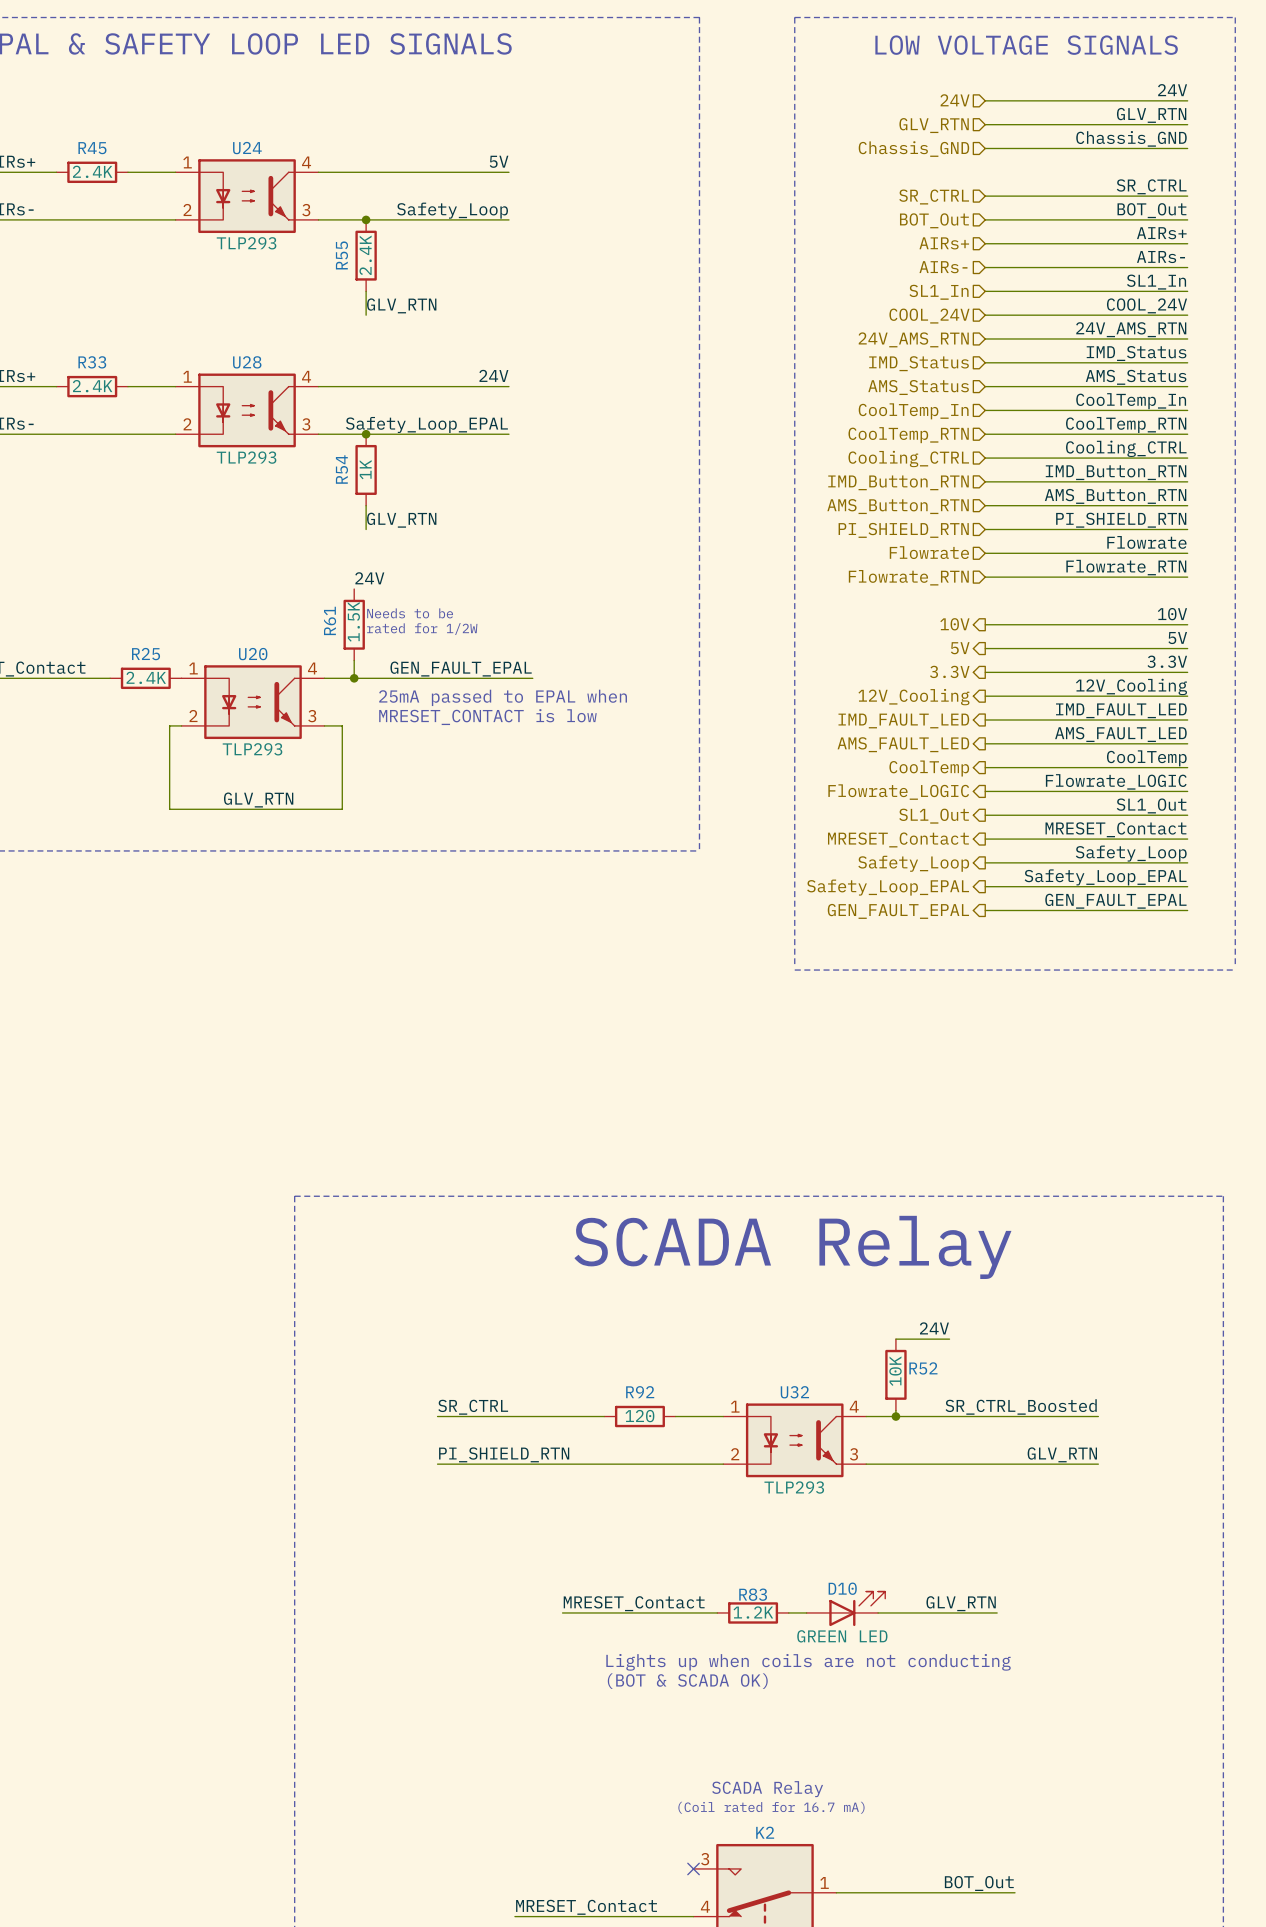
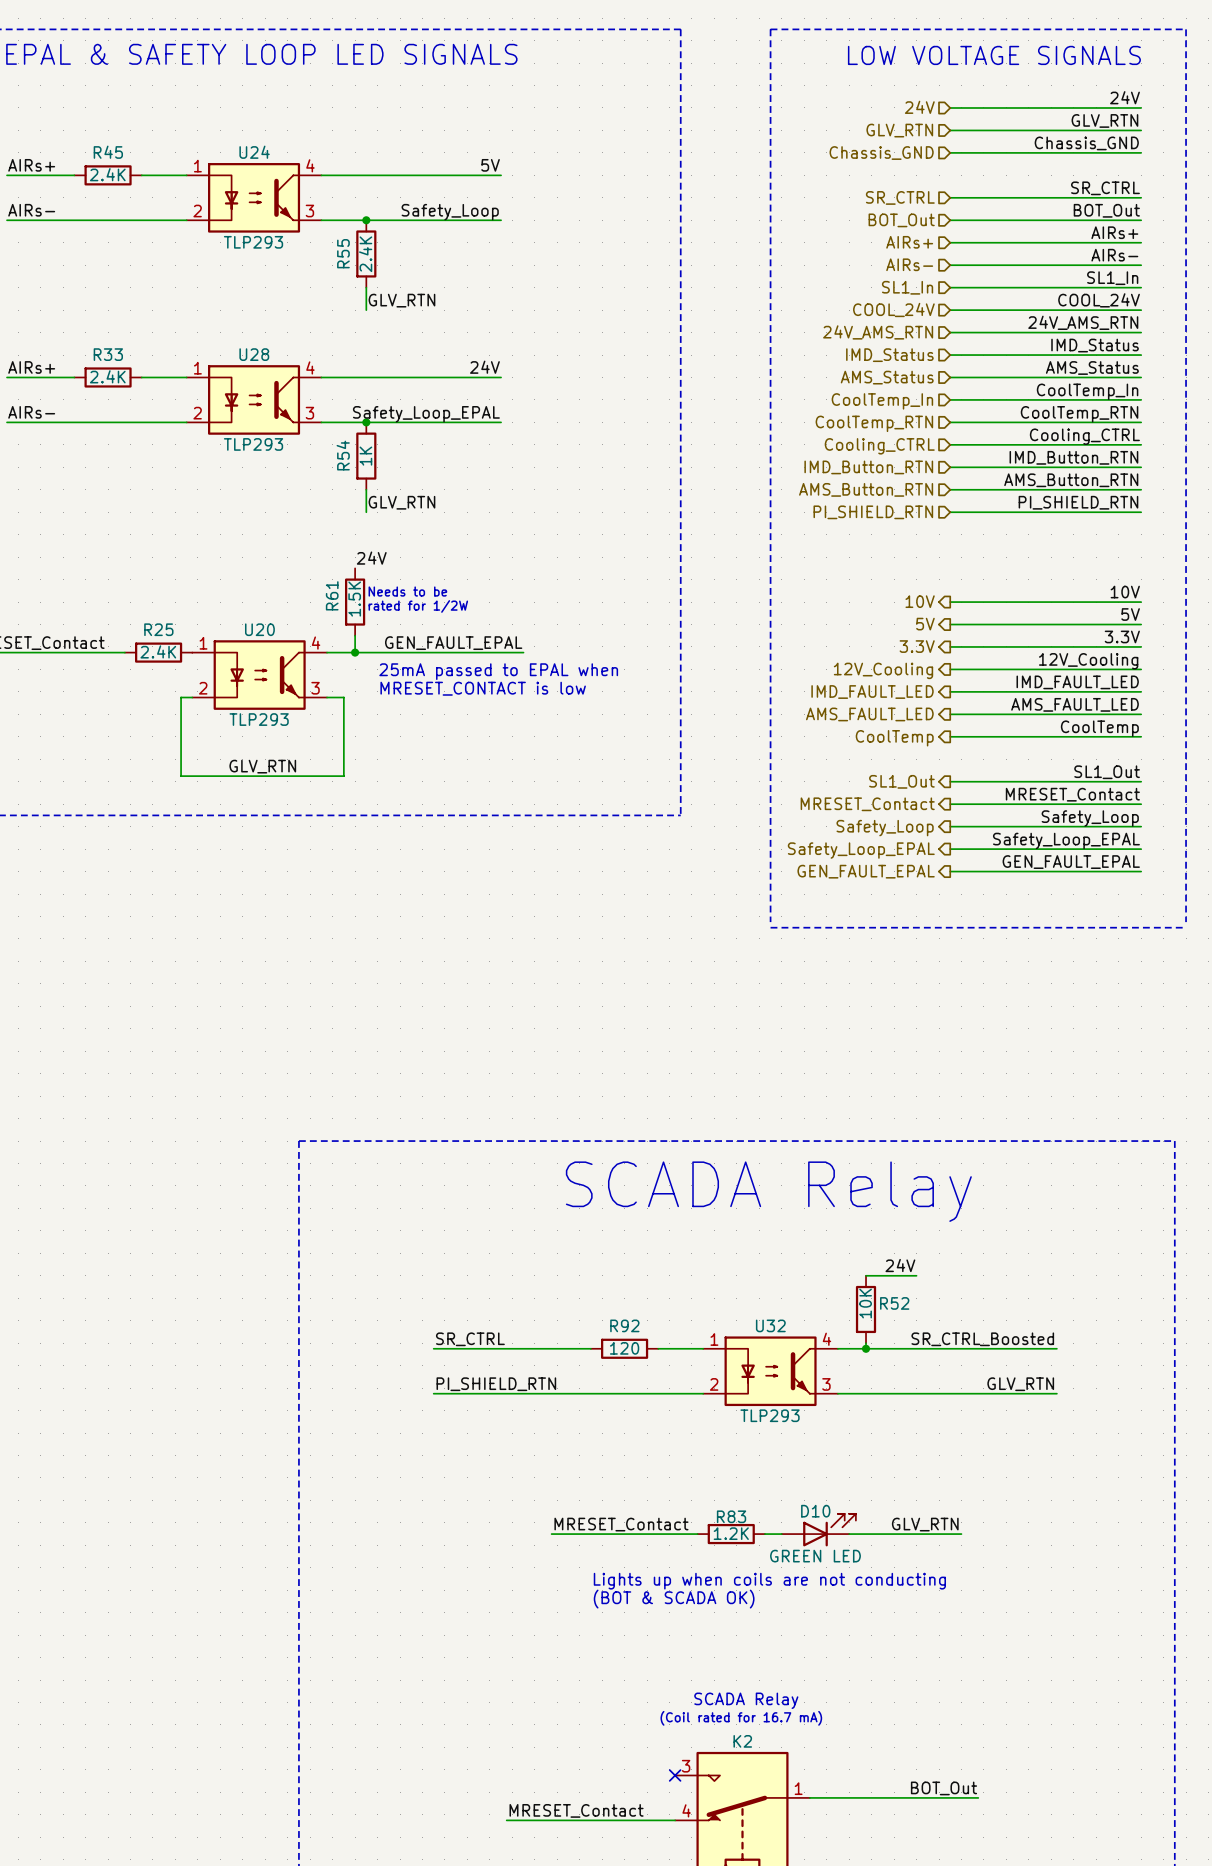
label: Flowrate (1146, 542) -> none
hierarchical label: Flowrate (929, 552) -> none
wire: (985, 553) (1187, 553) -> none
label: Flowrate_RTN (1126, 567) -> none
hierarchical label: Flowrate_RTN (908, 577) -> none
wire: (985, 577) (1187, 577) -> none
label: Flowrate_LOGIC (1116, 781) -> none
wire: (985, 791) (1187, 791) -> none
hierarchical label: Flowrate_LOGIC (898, 792) -> none

